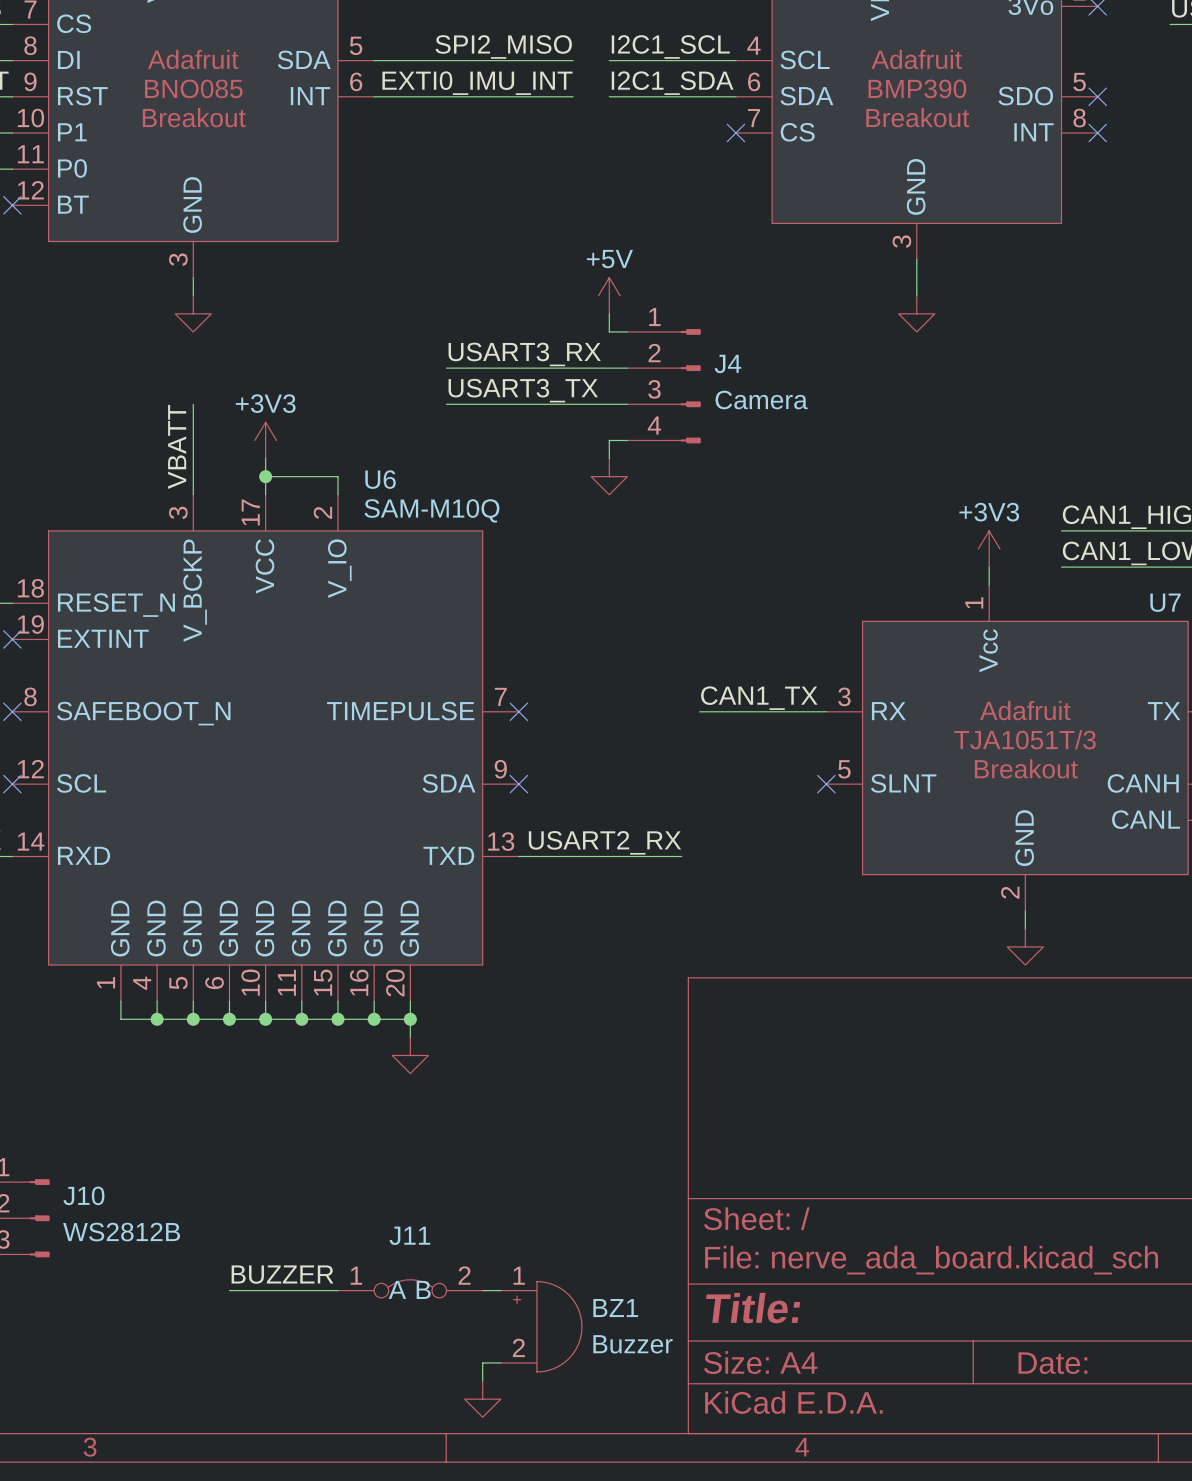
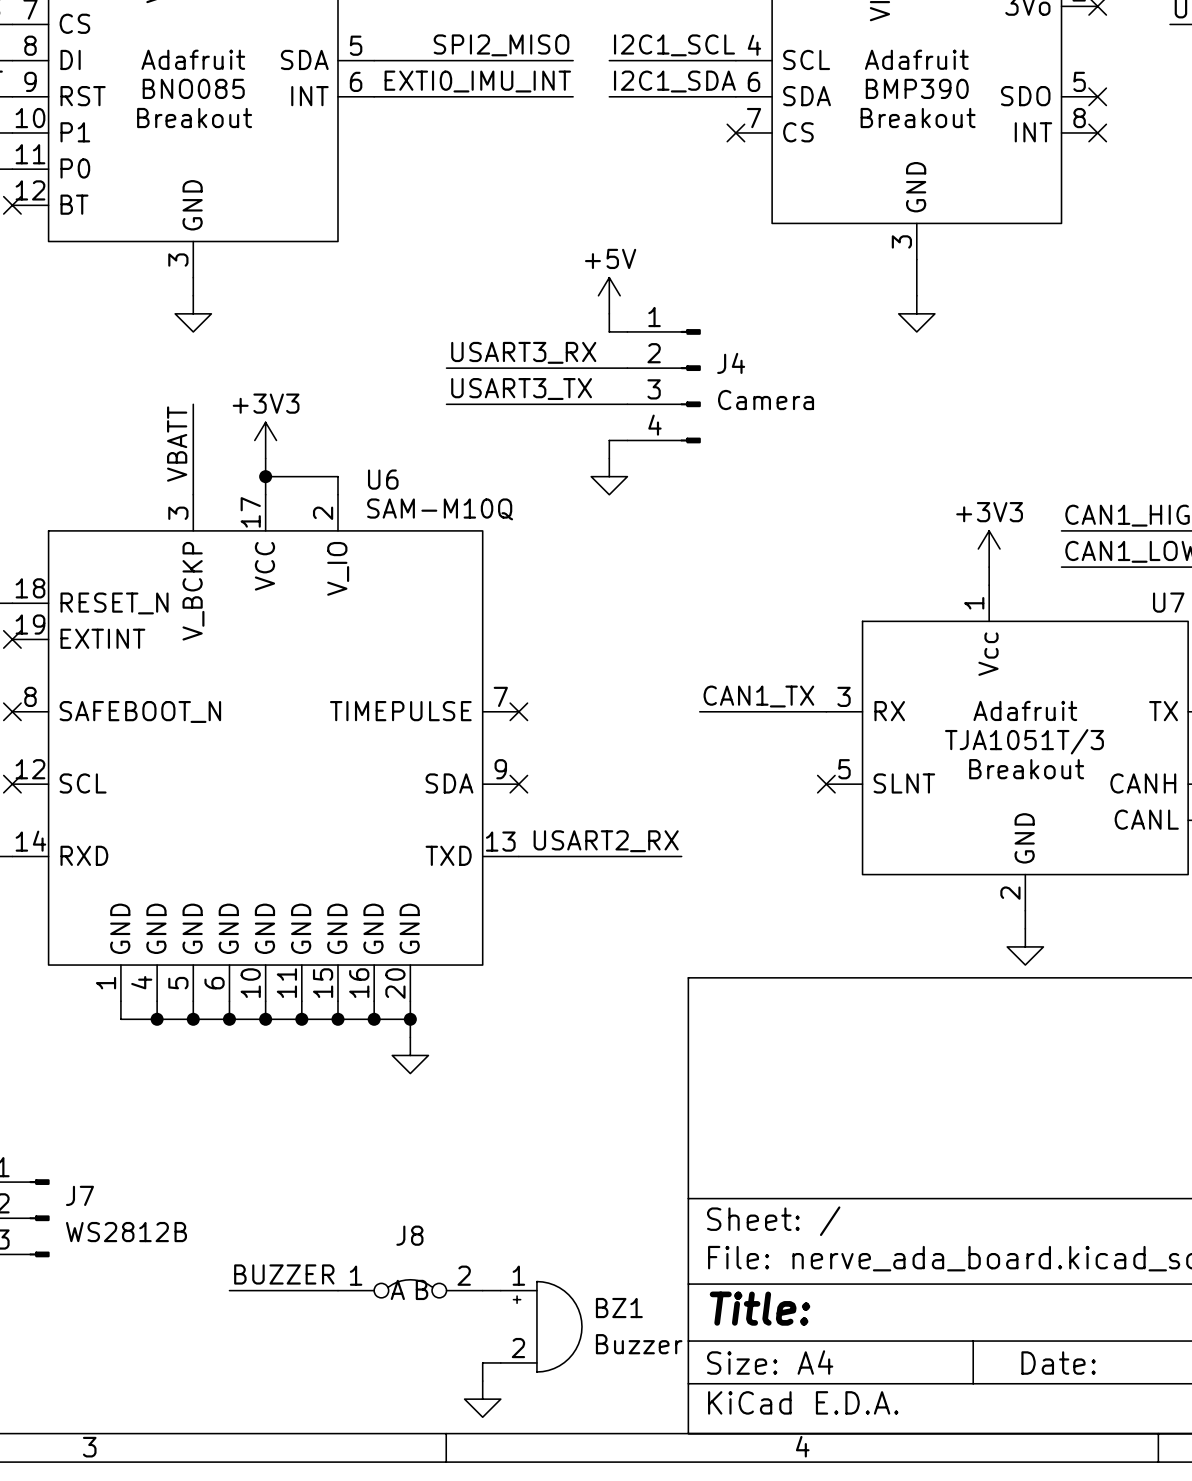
J10 name: J10 (83, 1195) -> J7 (79, 1195)
J11 name: J11 (409, 1235) -> J8 (409, 1235)

